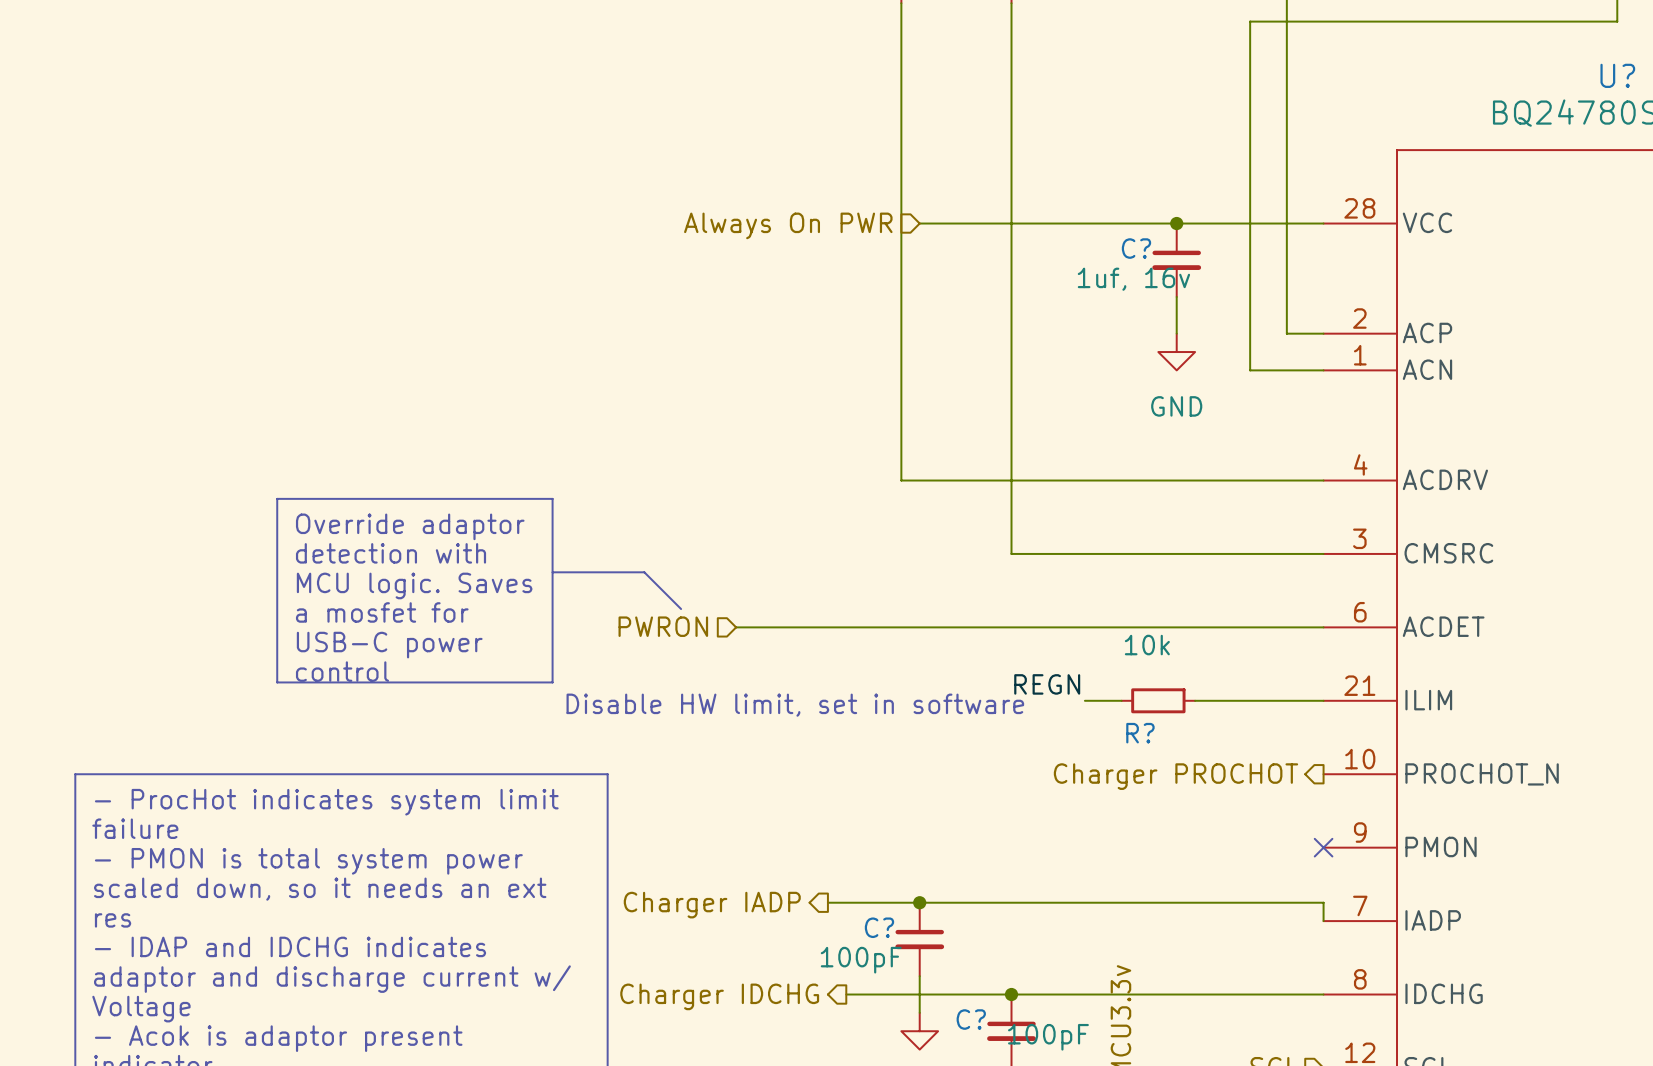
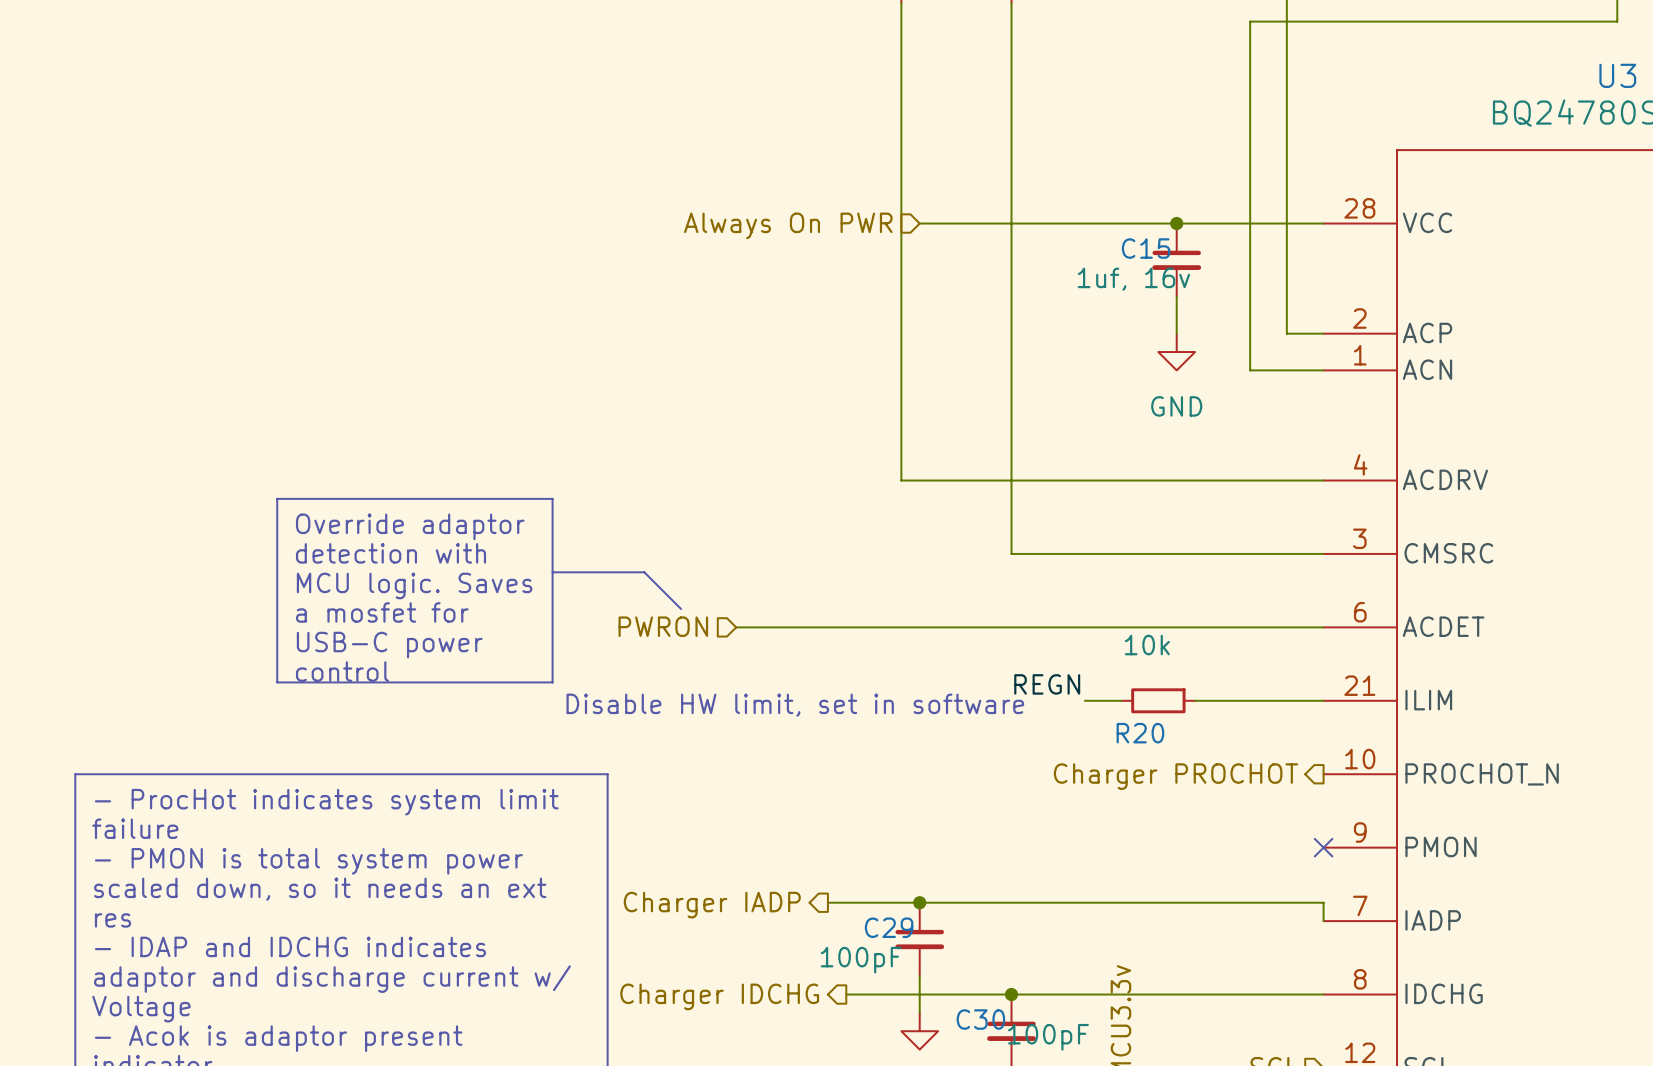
U? name: U? (1617, 75) -> U3 (1617, 75)
C? name: C? (1136, 248) -> C15 (1146, 248)
R? name: R? (1140, 733) -> R20 (1140, 733)
C? name: C? (879, 927) -> C29 (889, 927)
C? name: C? (971, 1019) -> C30 (980, 1019)

